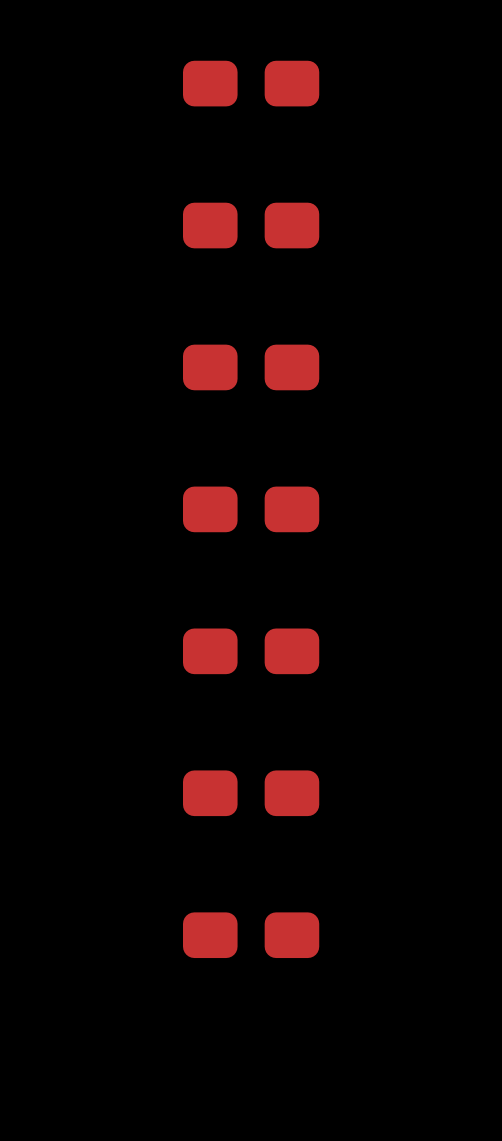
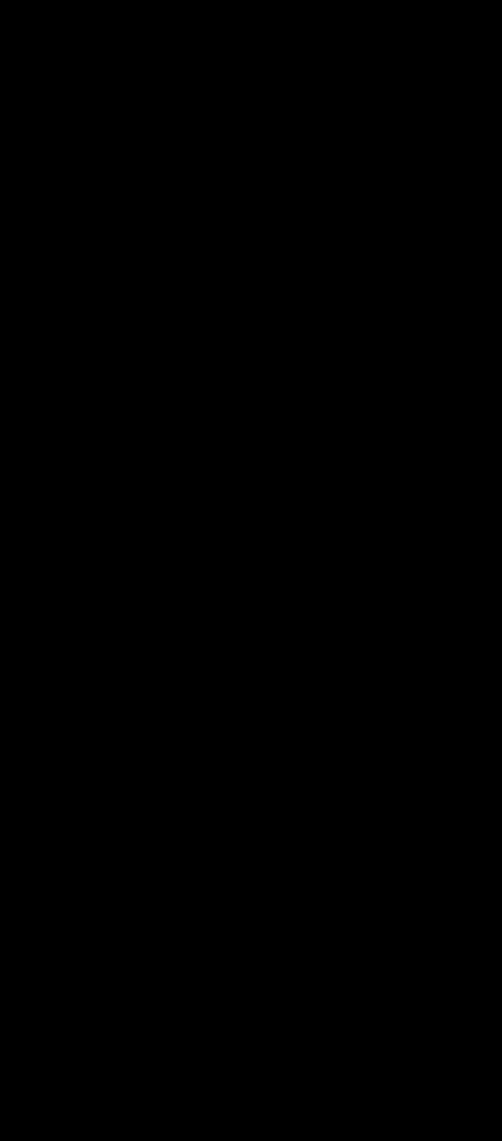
part: (251, 83) -> none
part: (251, 225) -> none
part: (251, 367) -> none
part: (251, 509) -> none
part: (251, 651) -> none
part: (251, 793) -> none
part: (251, 935) -> none

